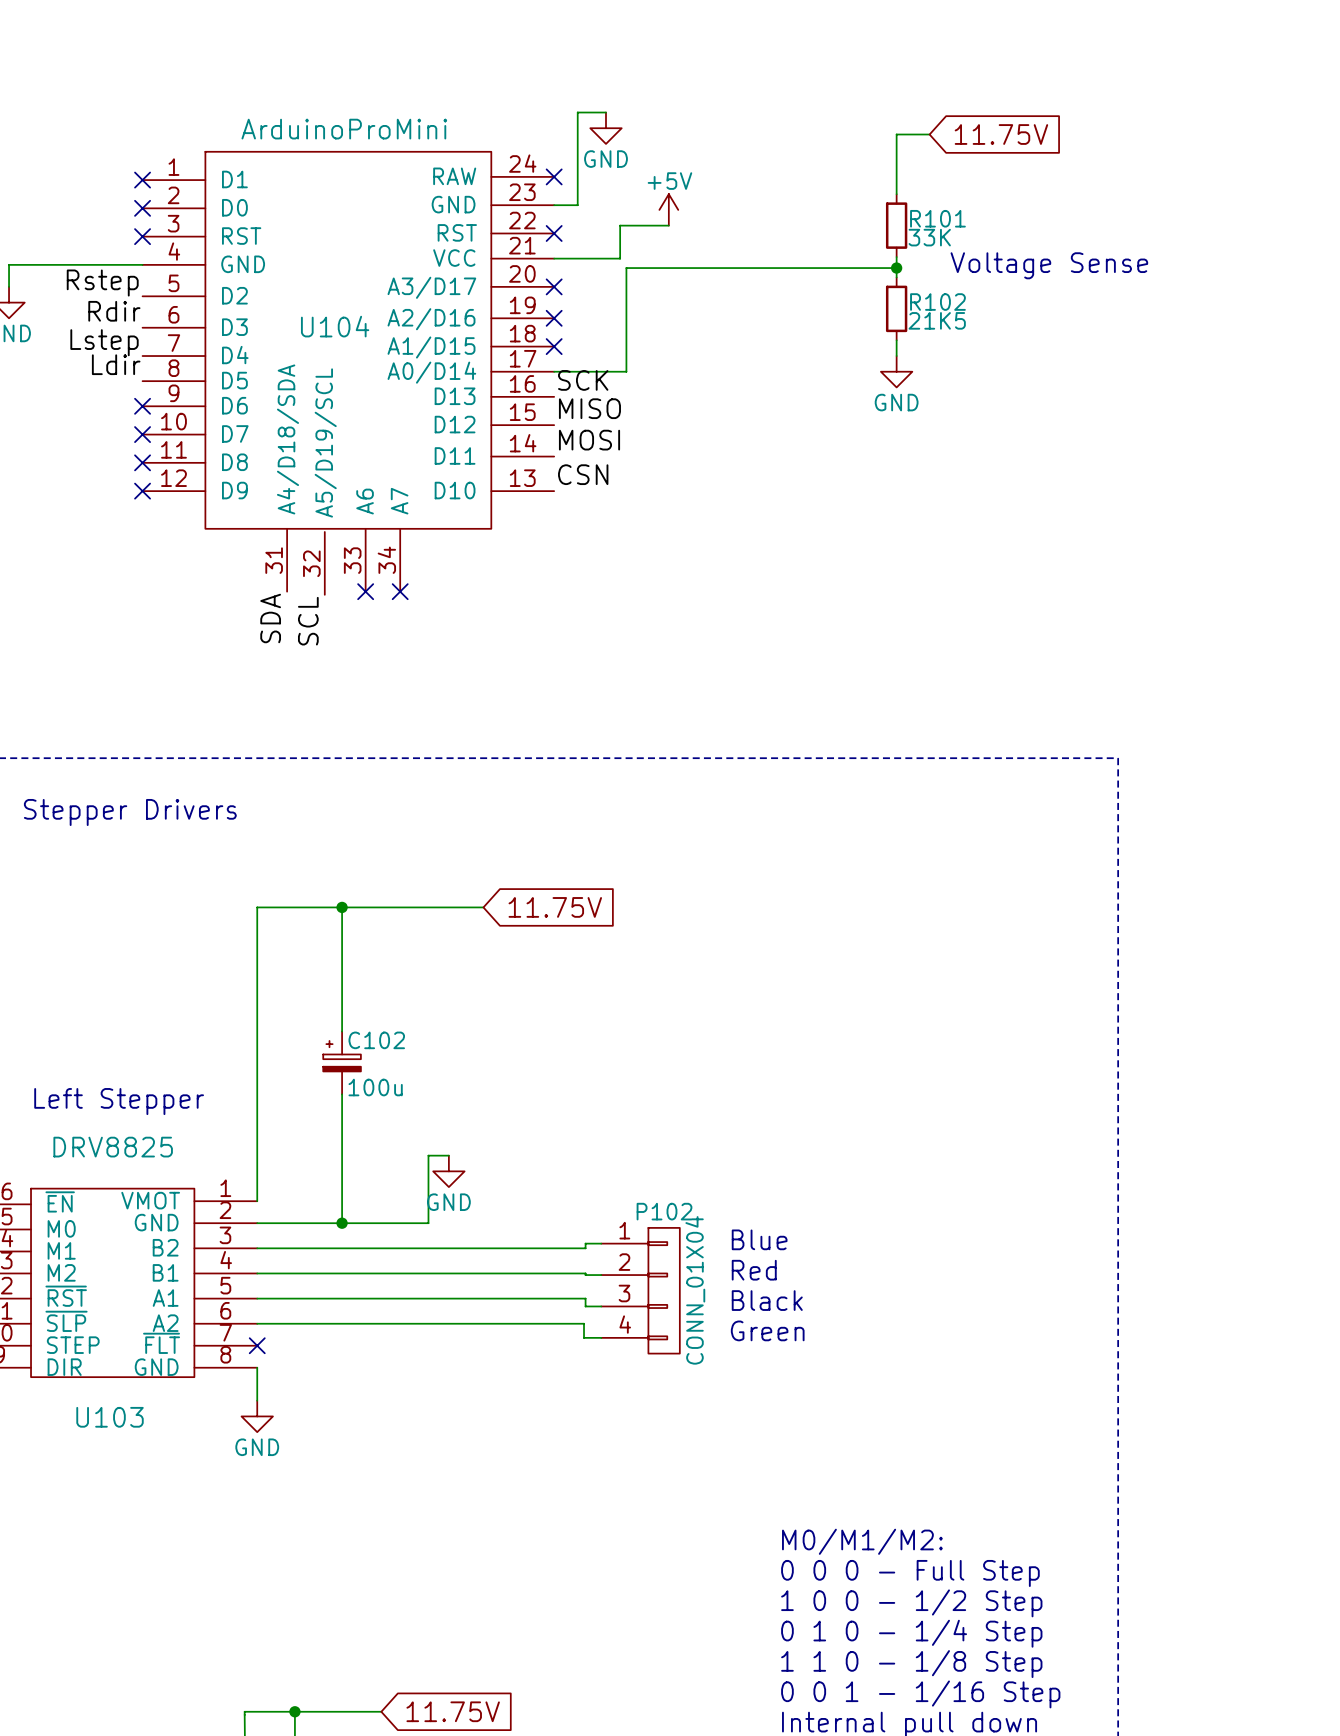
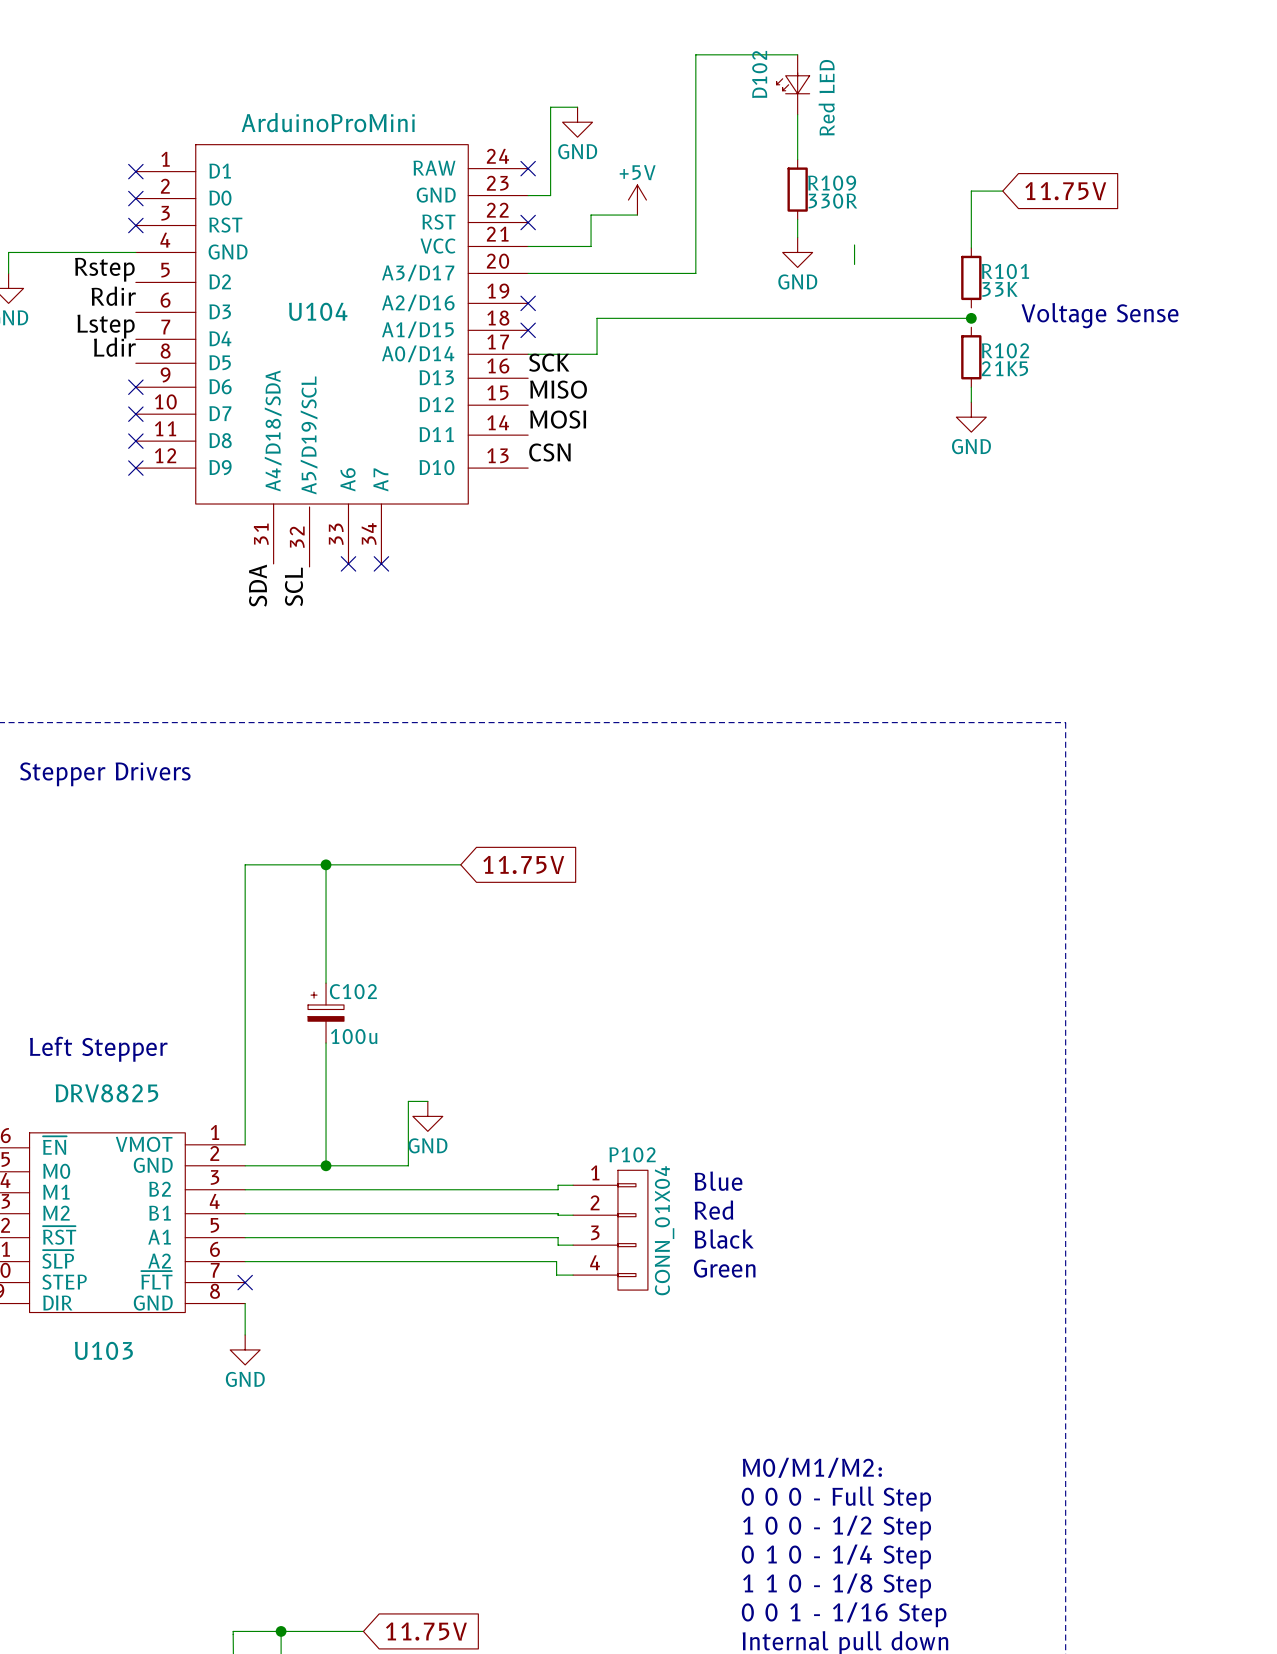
wire: none -> (797, 54) (695, 54) (695, 273) (528, 273)
D102: none -> Red LED (793, 84)
wire: none -> (797, 114) (797, 159)
wire: (929, 134) (896, 134) (896, 194) -> (1002, 191) (971, 191) (971, 247)
global label position: 11.75V (1001, 134) -> 11.75V (1065, 191)
R109: none -> 330R (797, 189)
R101 position: (896, 225) -> (971, 277)
wire: none -> (797, 219) (797, 237)
power symbol: none -> GND (797, 252)
text position: Voltage Sense (1049, 265) -> Voltage Sense (1099, 315)
wire: (896, 268) (626, 268) (626, 334) -> (971, 318) (597, 318)
junction: (896, 268) -> none
no-connect mark: (554, 286) -> none
R102 position: (896, 308) -> (971, 357)
junction: none -> (971, 318)
wire: (896, 340) (896, 356) -> (971, 387) (971, 402)
power symbol: GND (896, 371) -> none
power symbol: none -> GND (971, 417)

